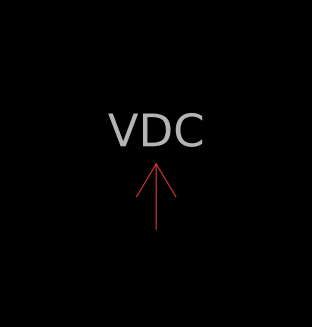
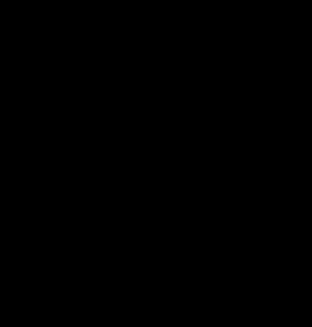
power symbol: VDC (156, 196) -> none

